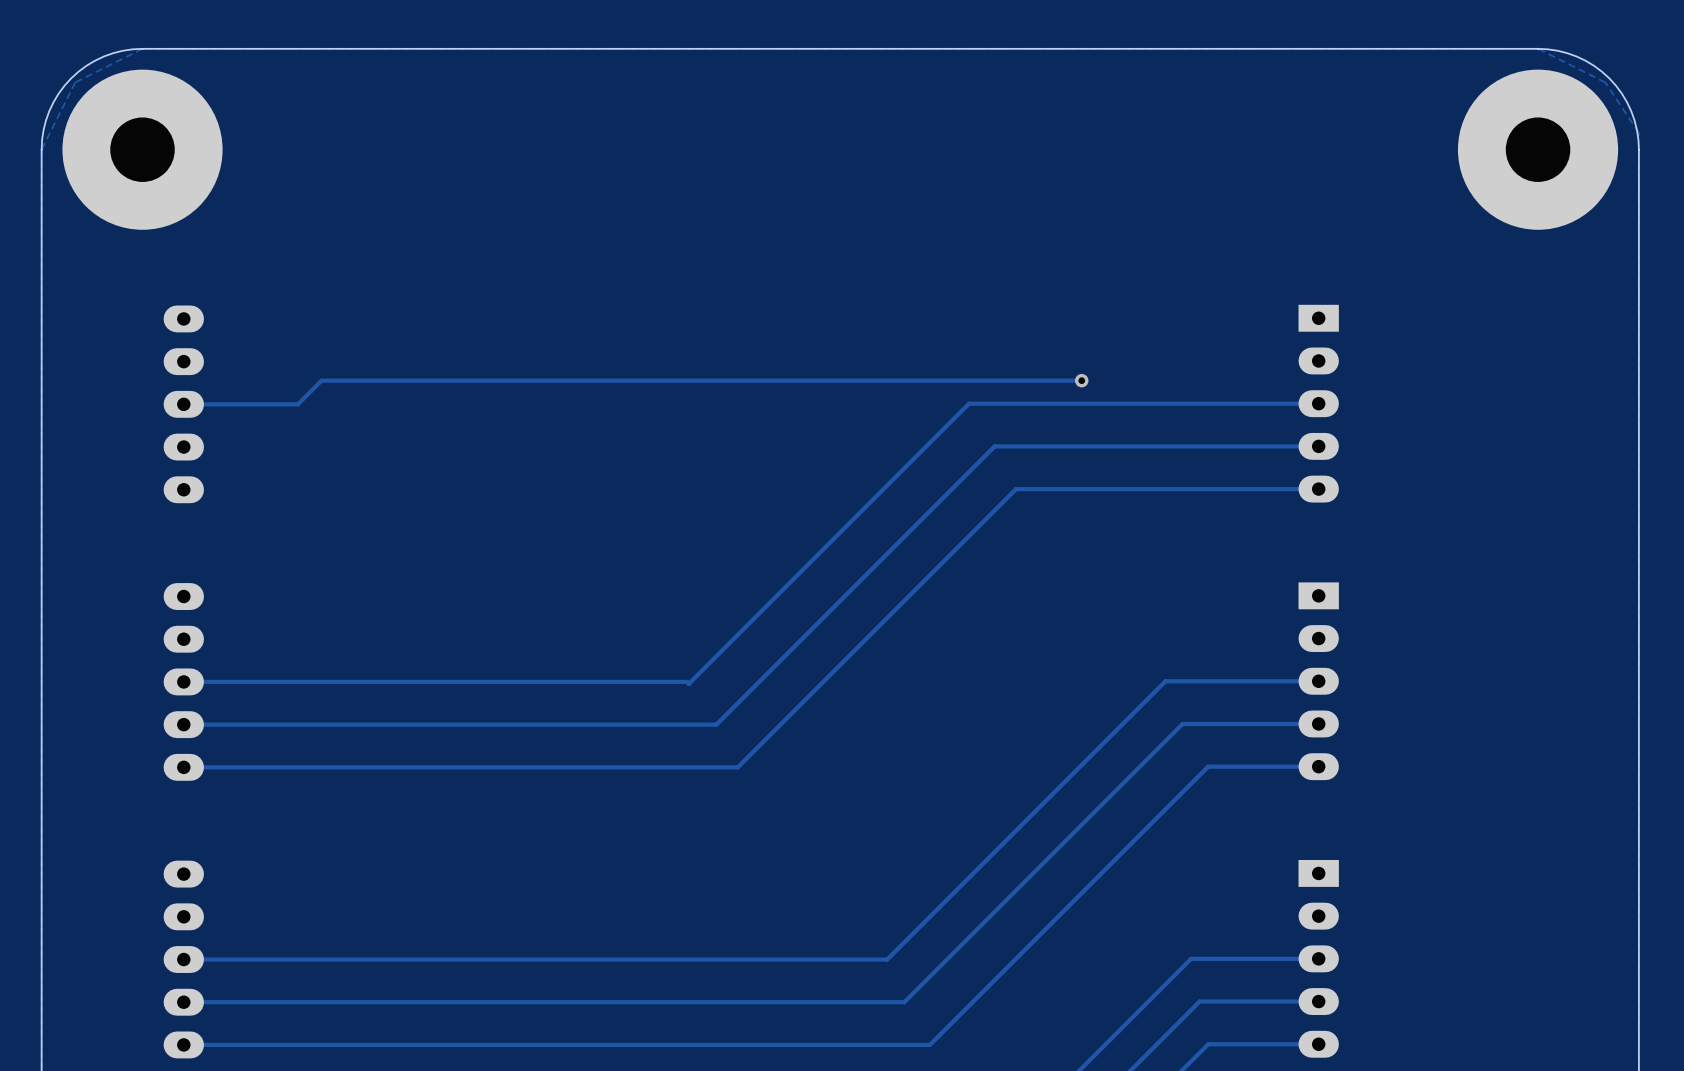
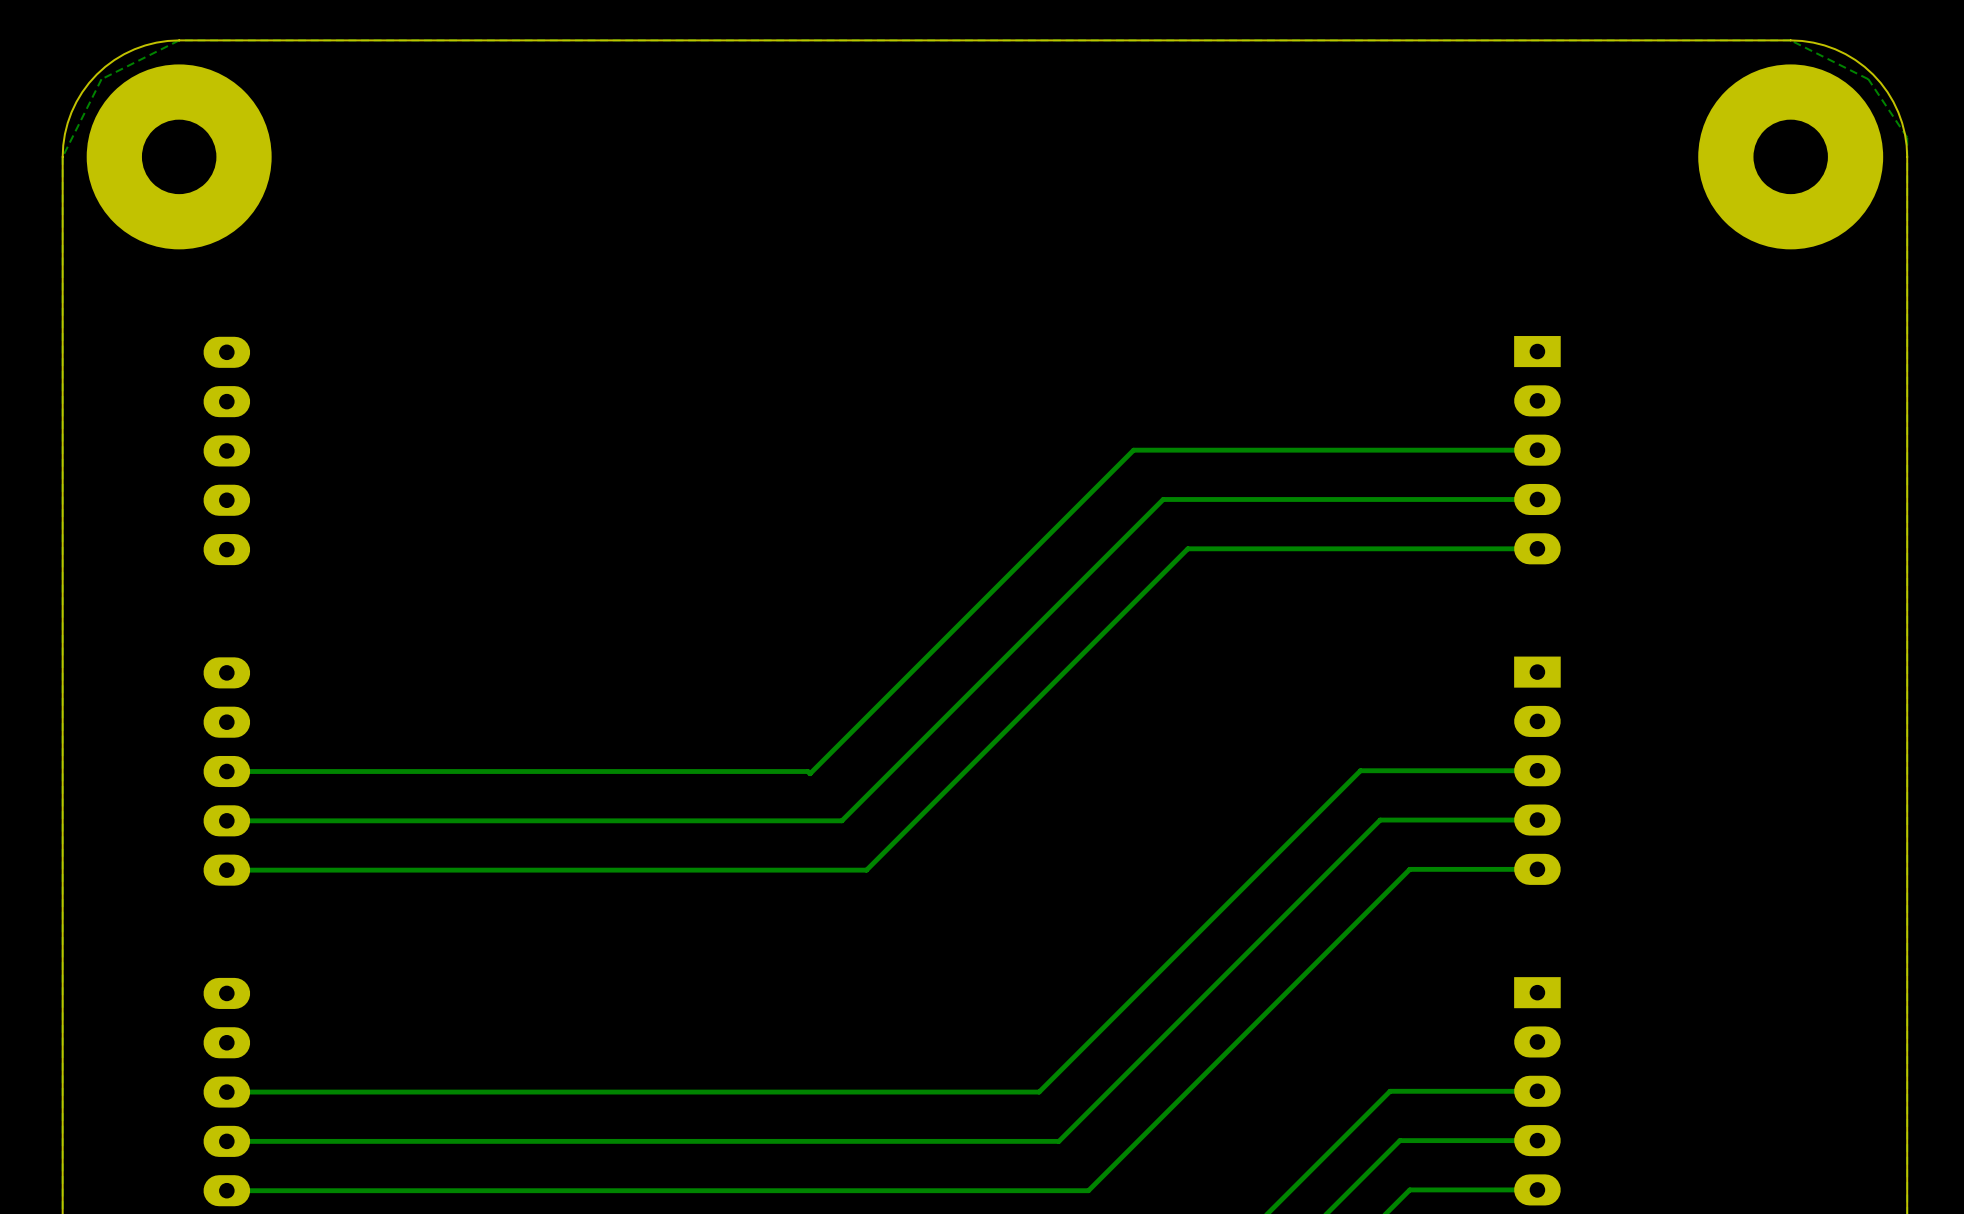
track: (1081, 380) (321, 380) (297, 404) (183, 404) -> none
via: (1081, 380) -> none

